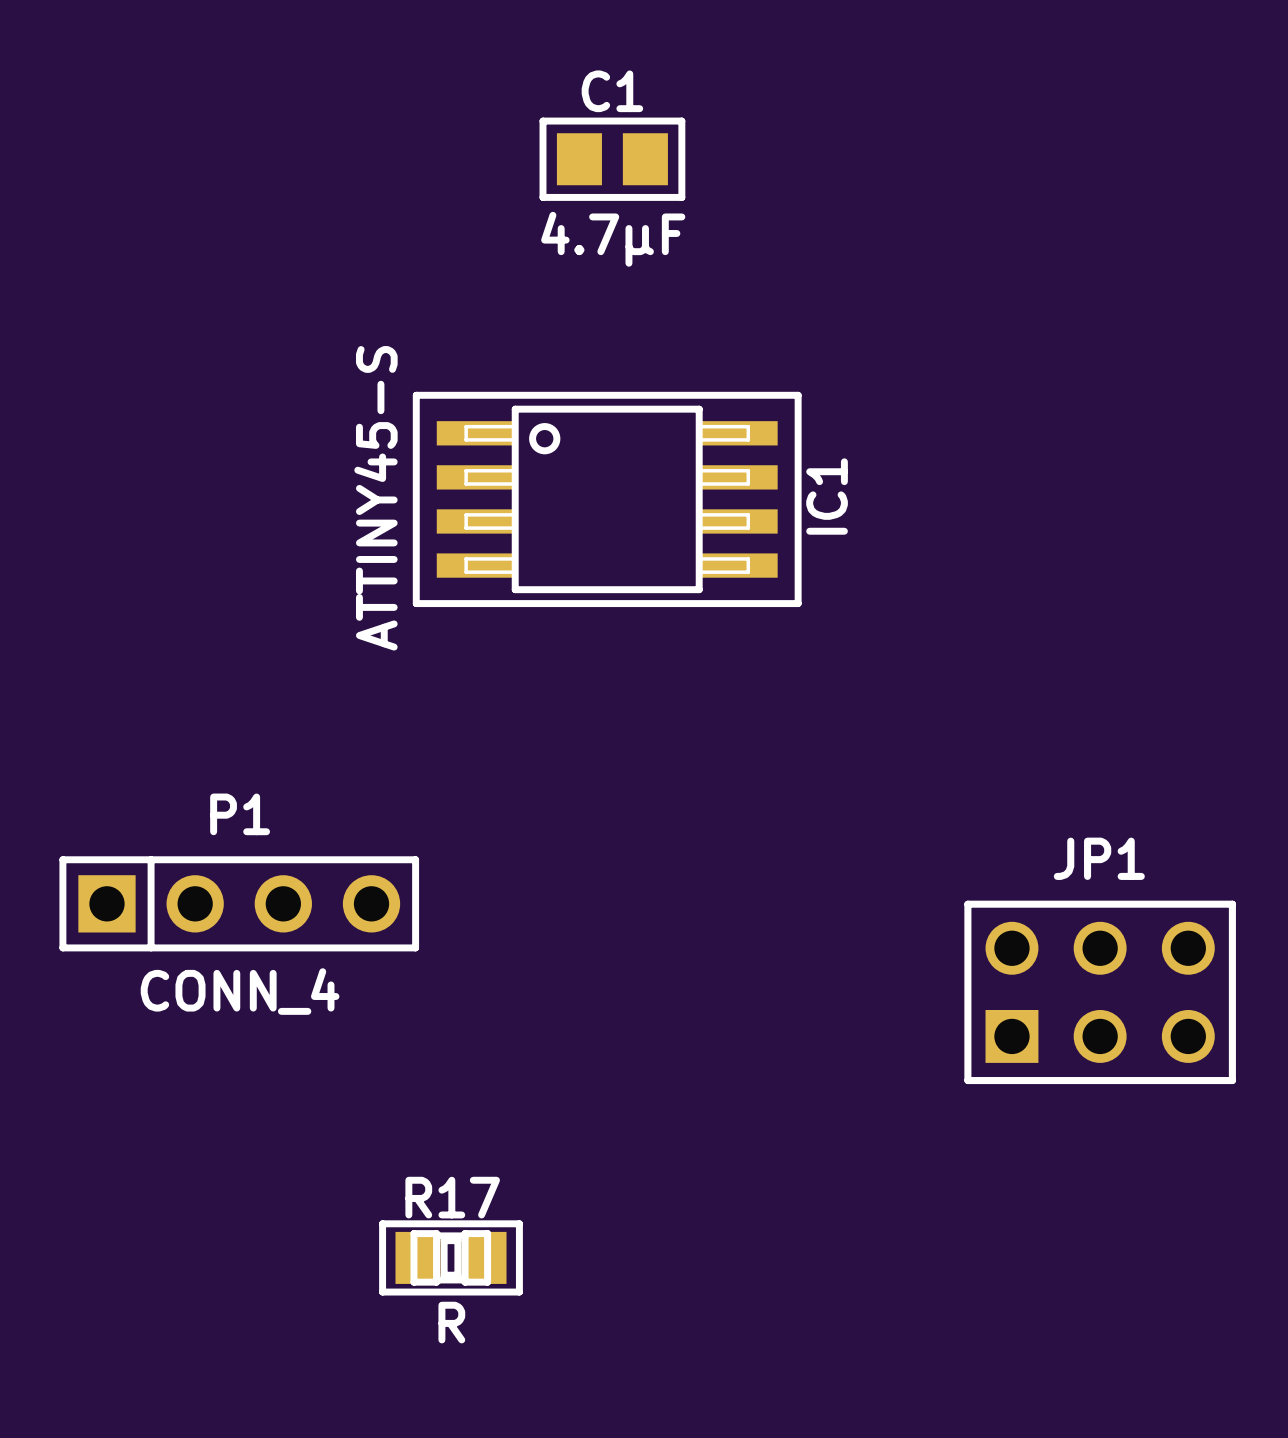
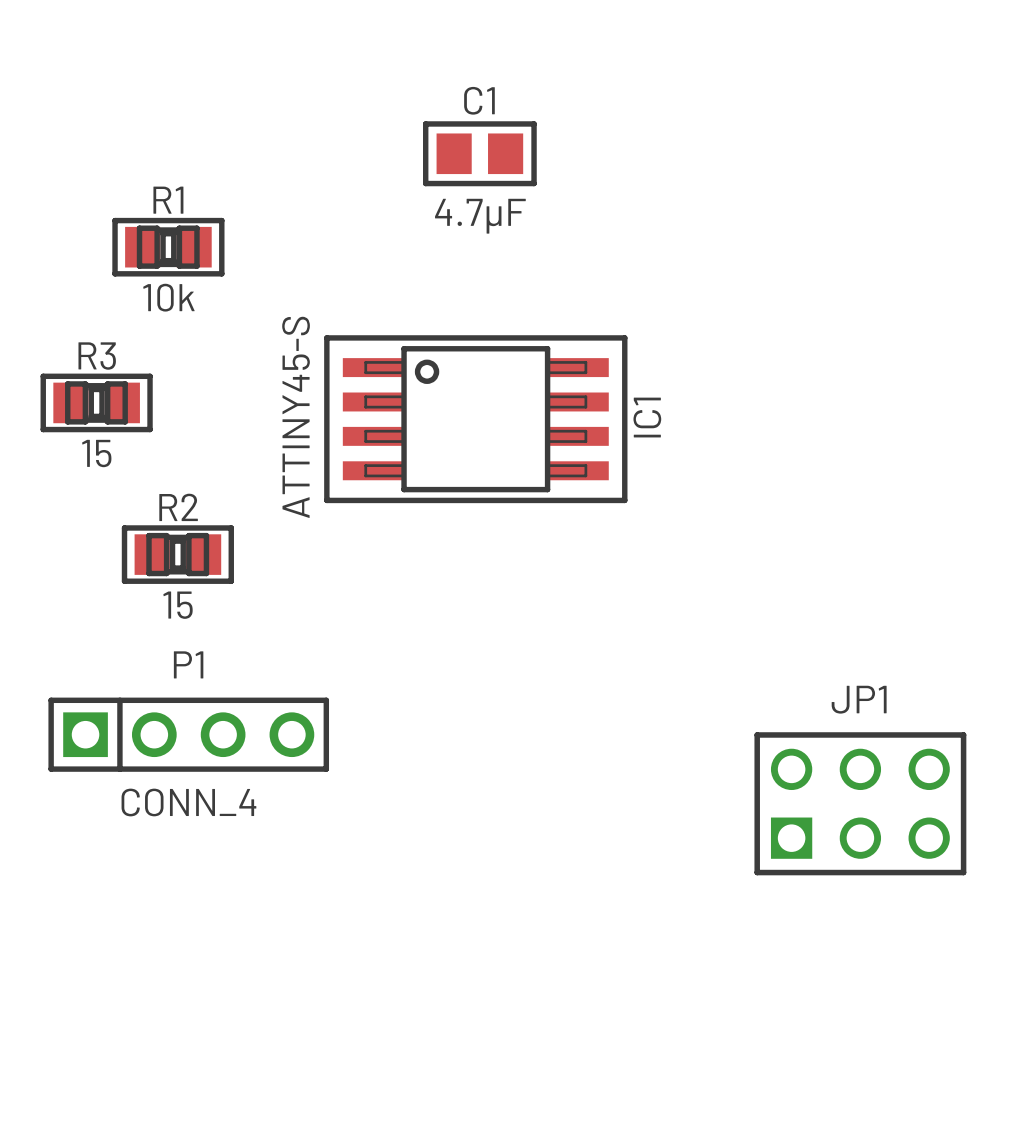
R1: none -> 10k (168, 247)
R3: none -> 15 (96, 402)
R2: none -> 15 (177, 554)
R17: R (451, 1257) -> none

